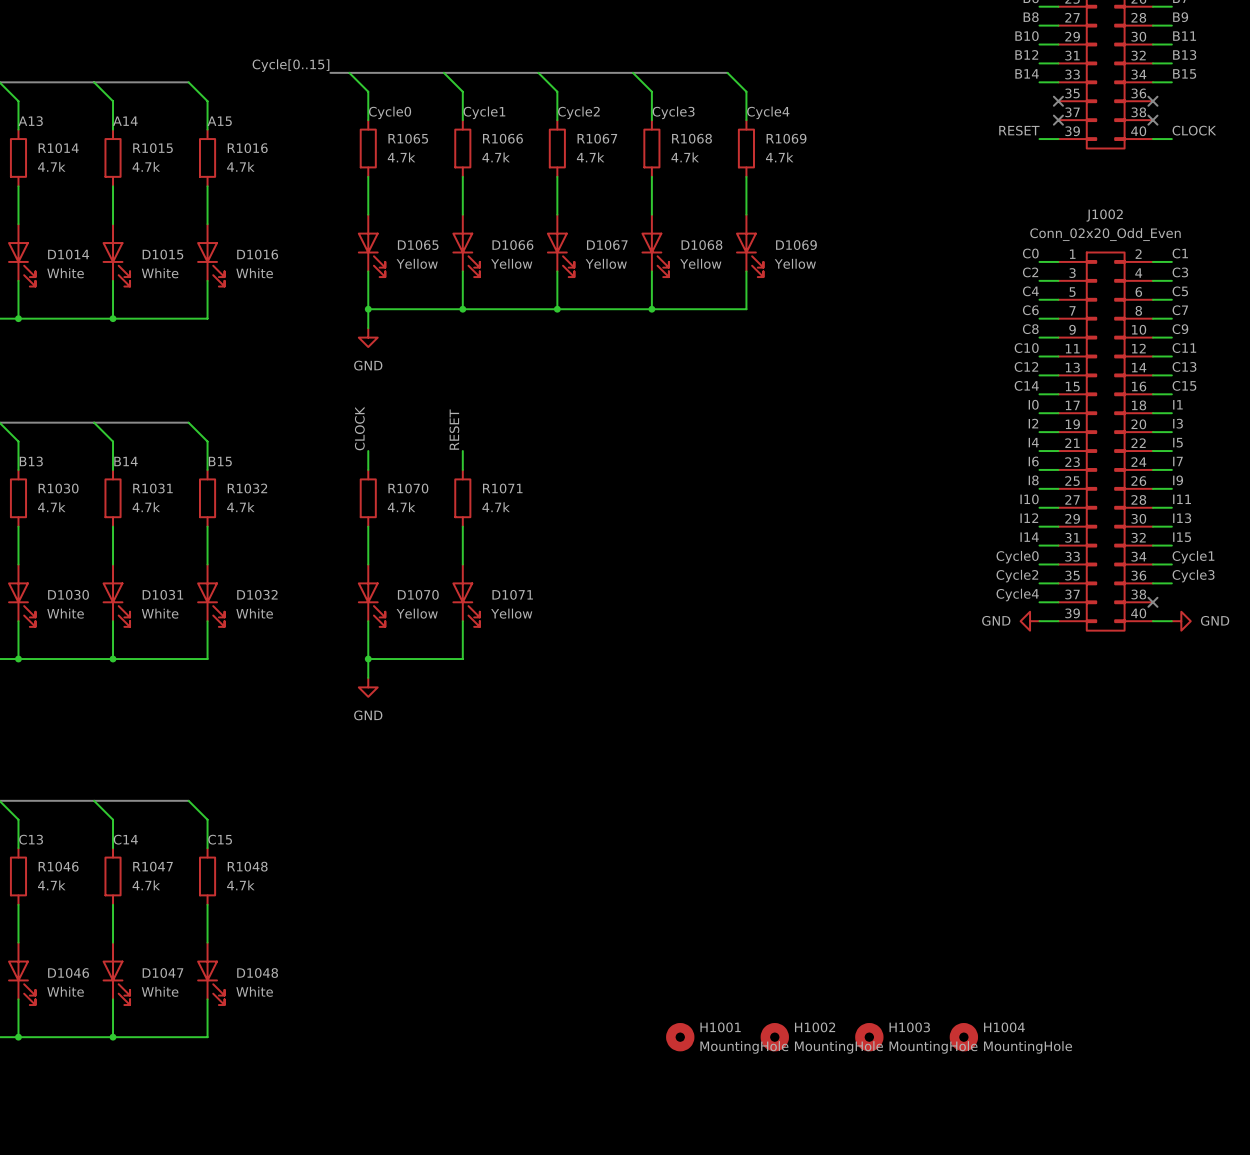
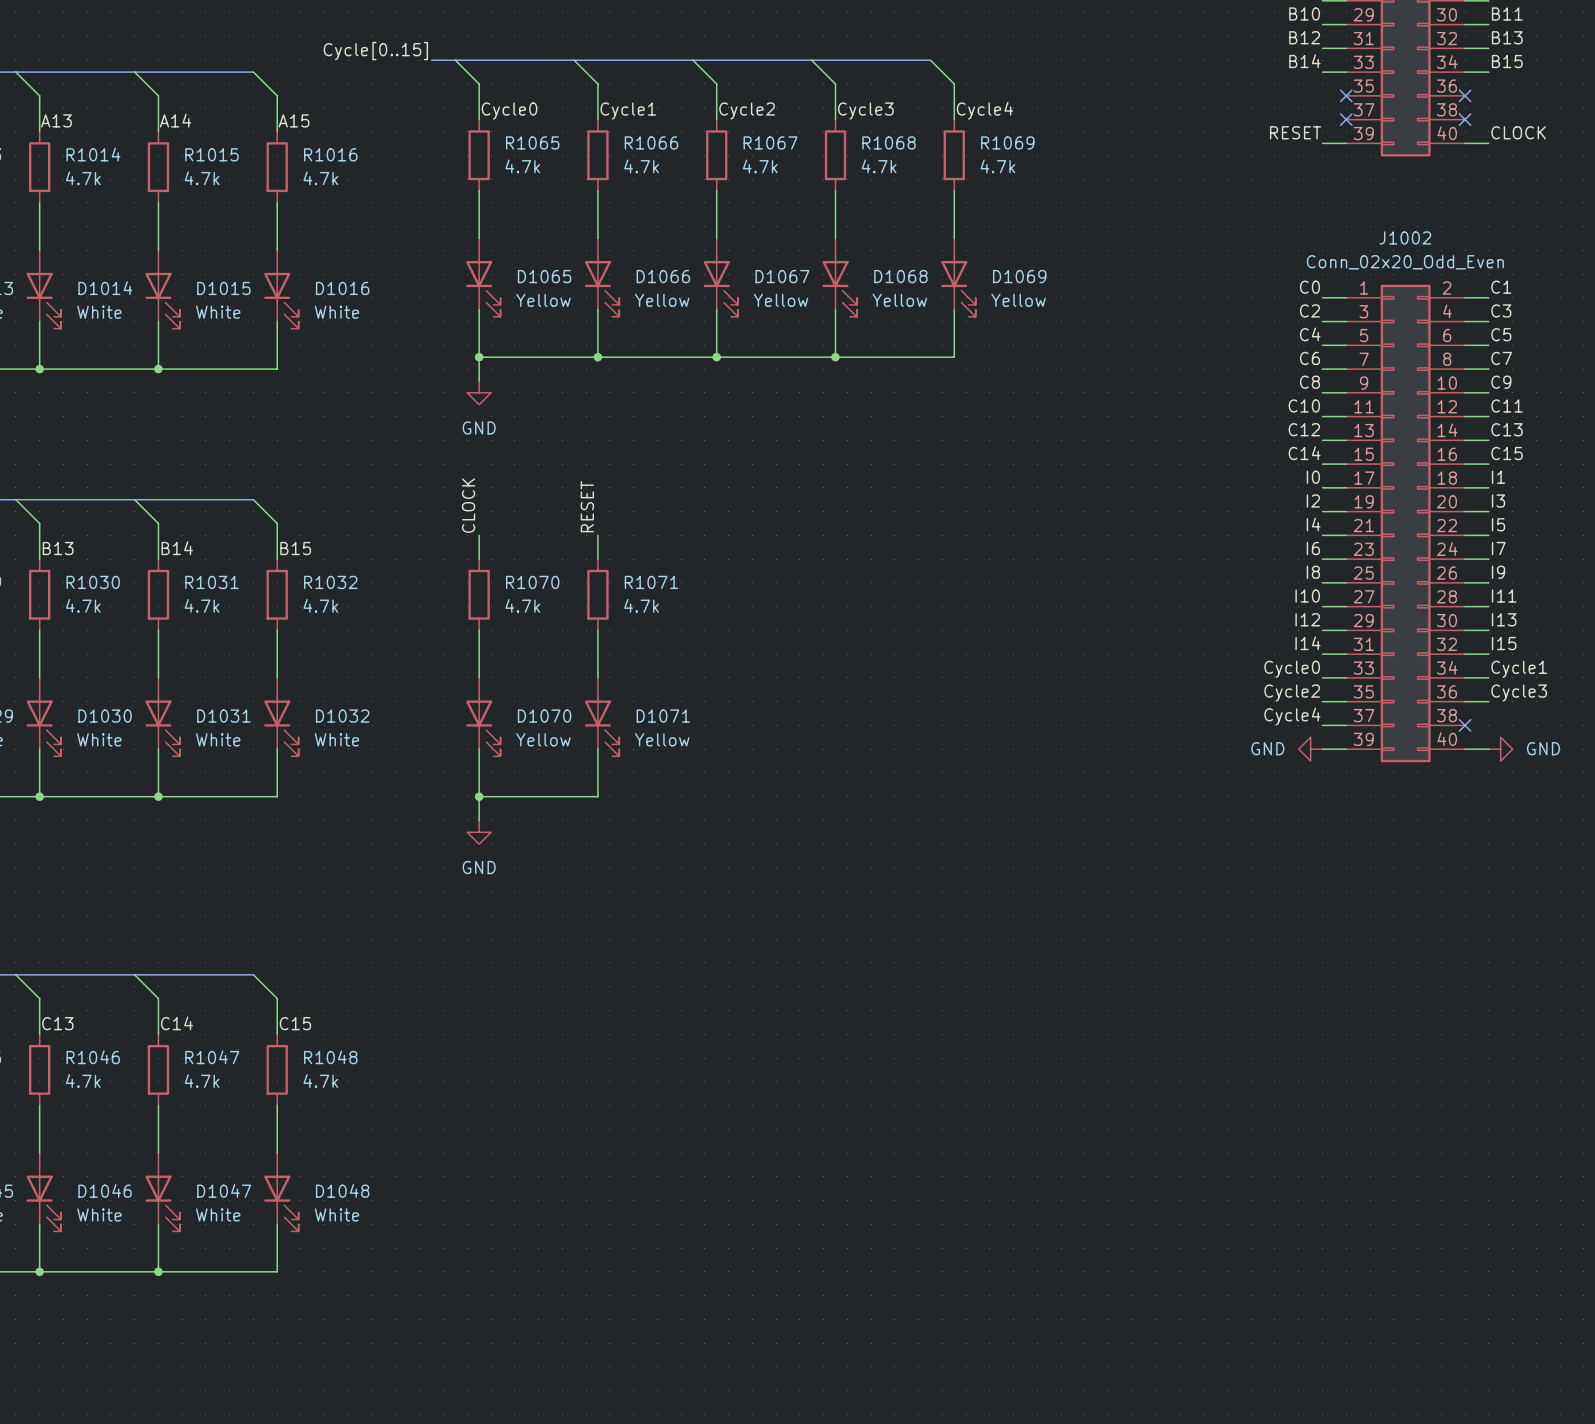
H1001: MountingHole (680, 1037) -> none
H1002: MountingHole (774, 1037) -> none
H1003: MountingHole (869, 1037) -> none
H1004: MountingHole (963, 1037) -> none

